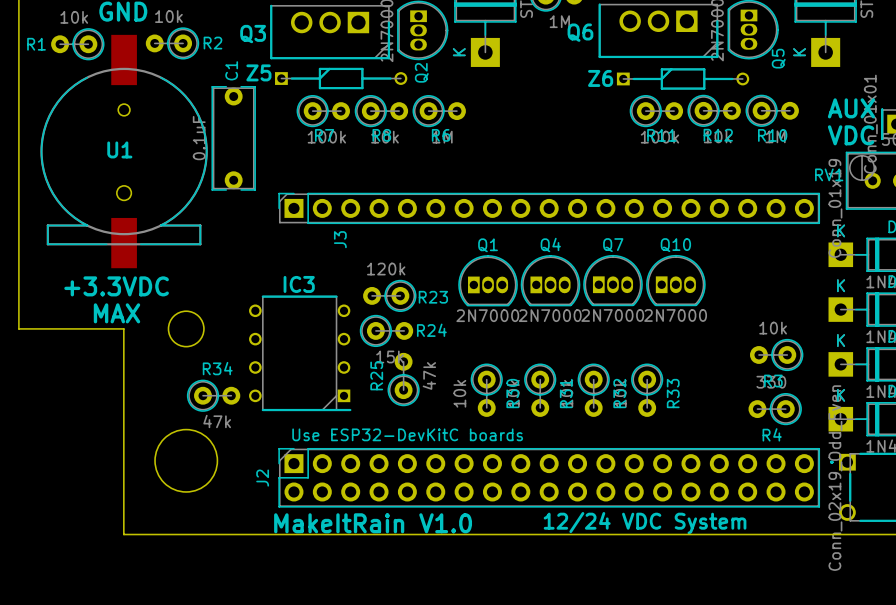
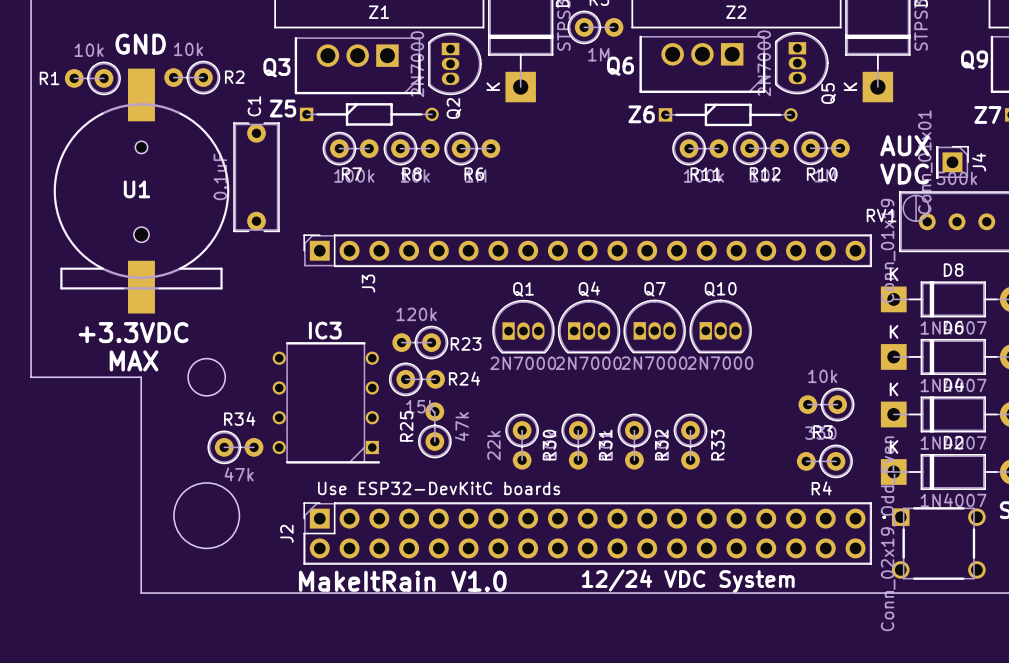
R30 value: 10k (459, 393) -> 22k (493, 445)

